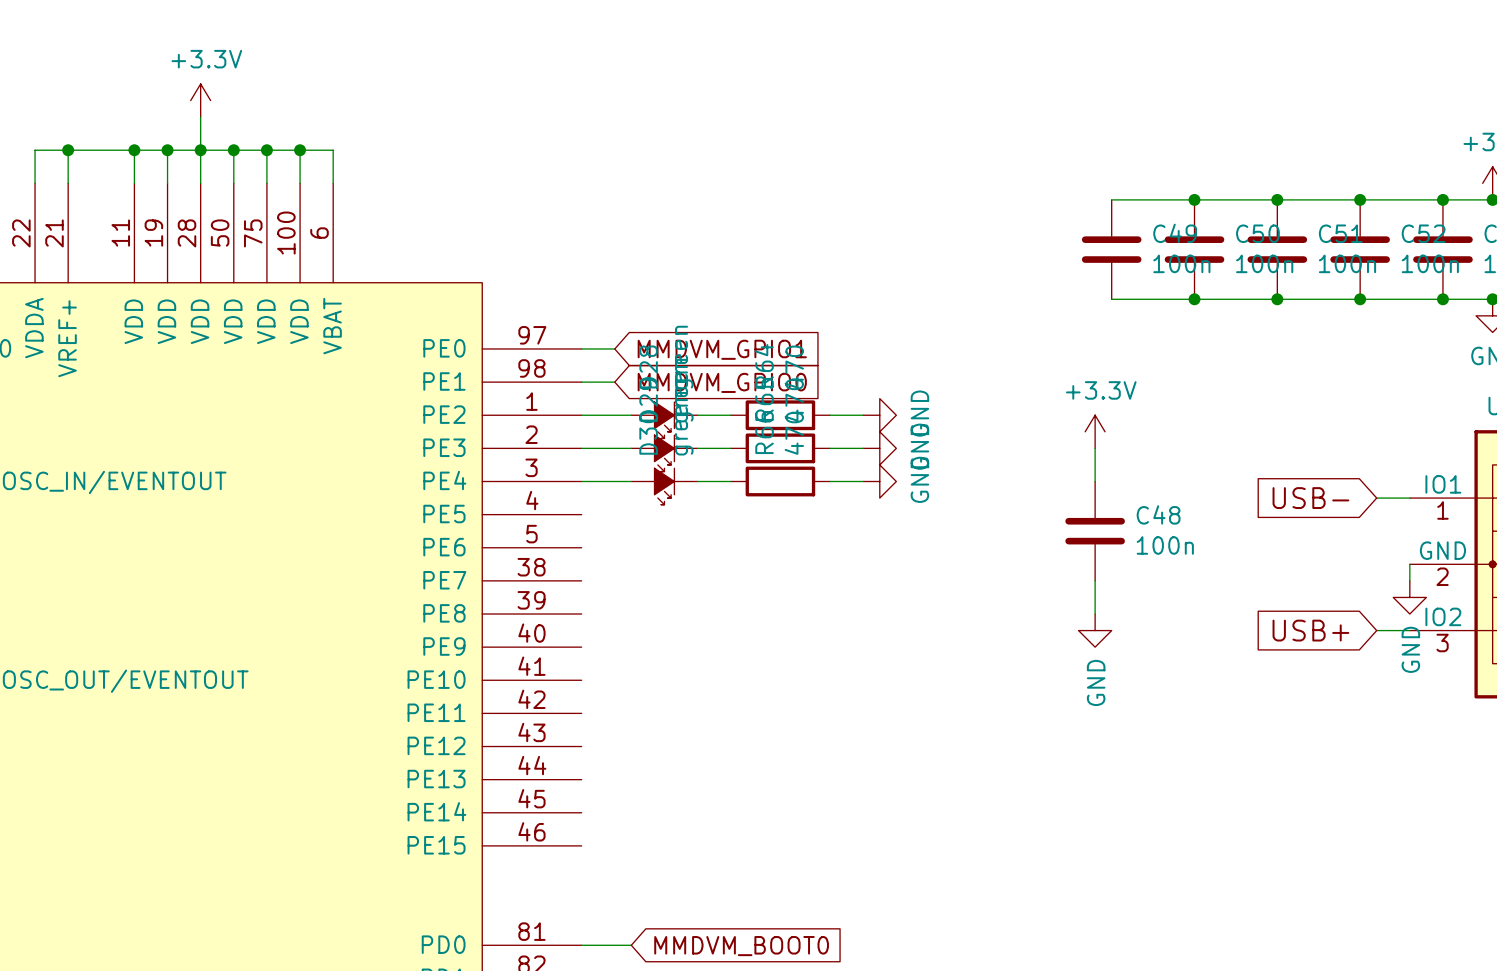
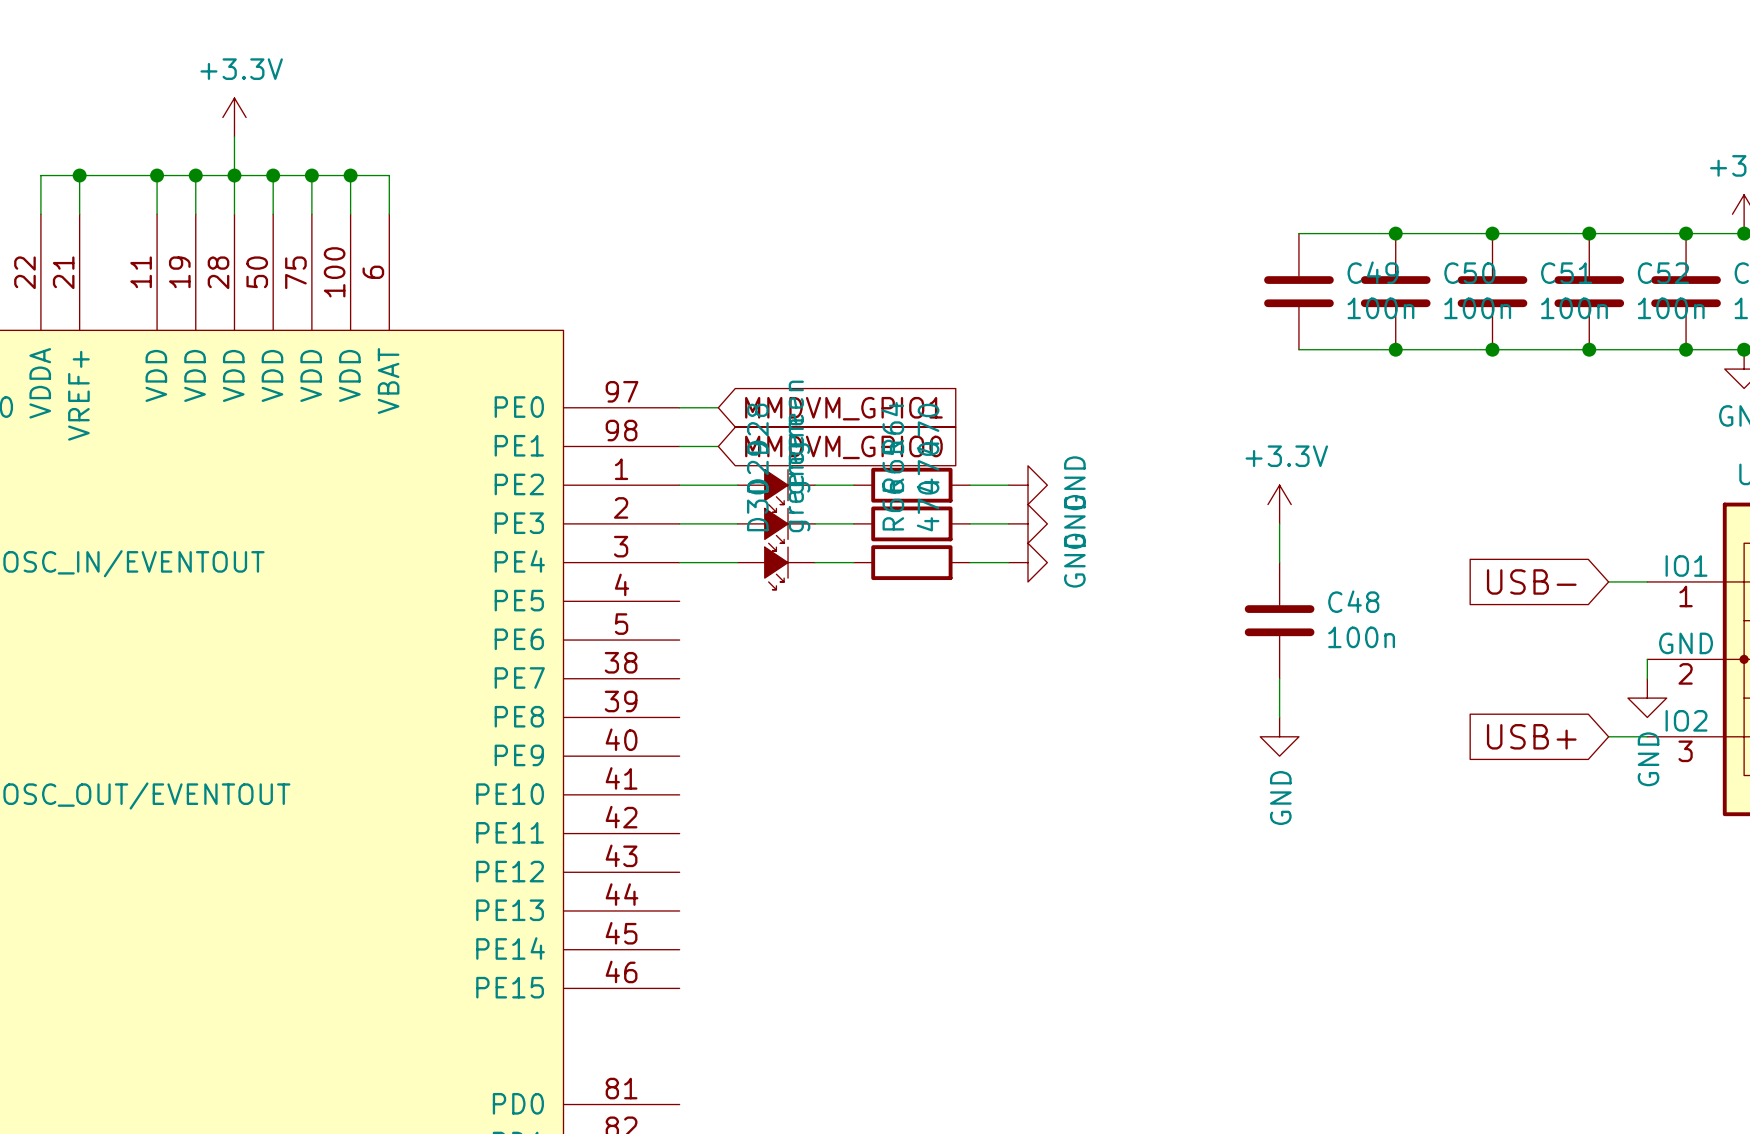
wire: (581, 945) (631, 945) -> none
global label: MMDVM_BOOT0 (741, 946) -> none

